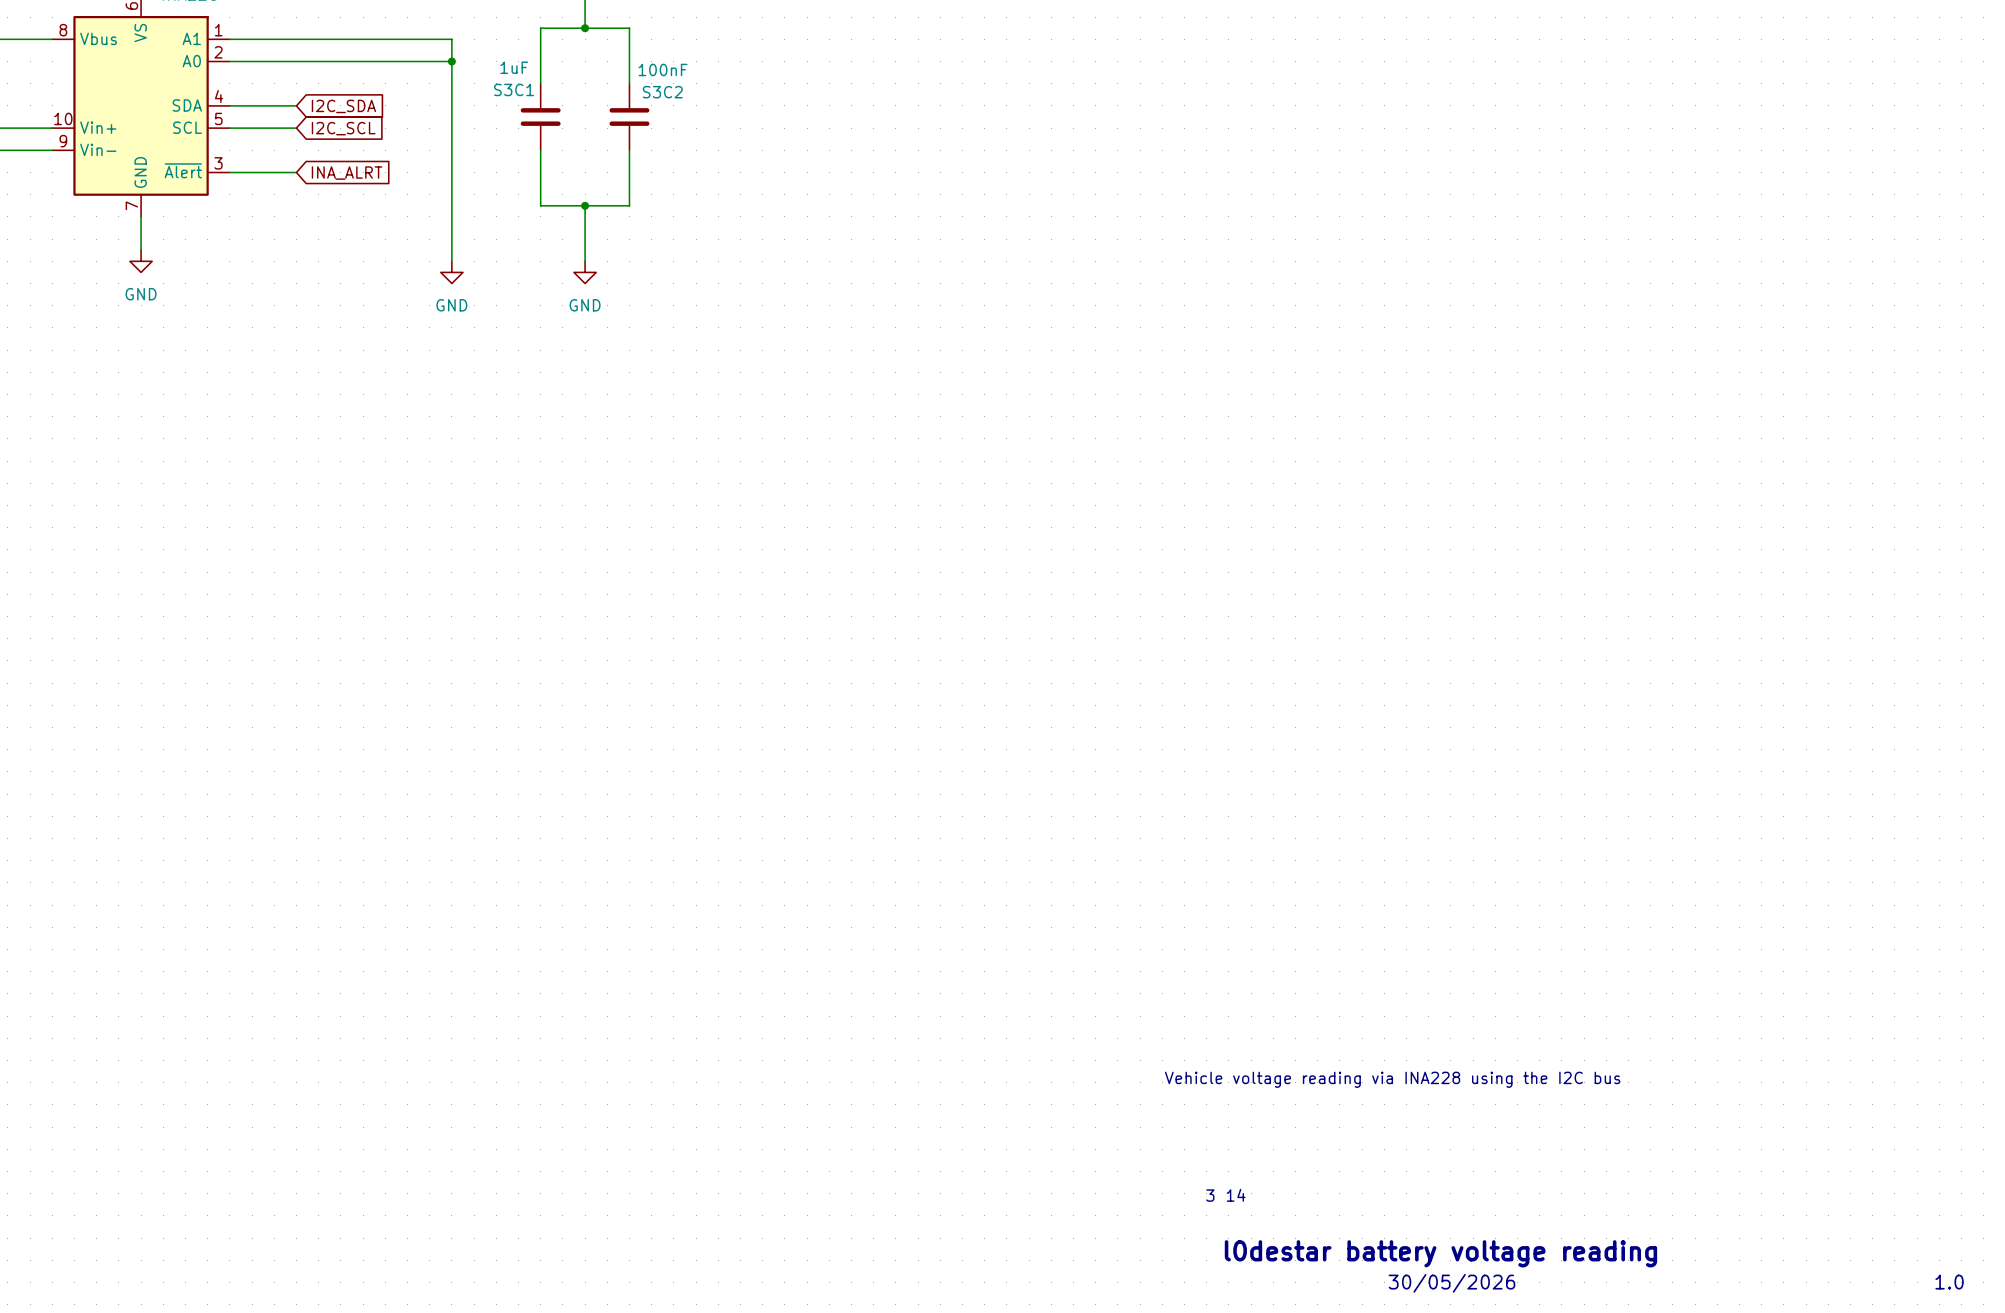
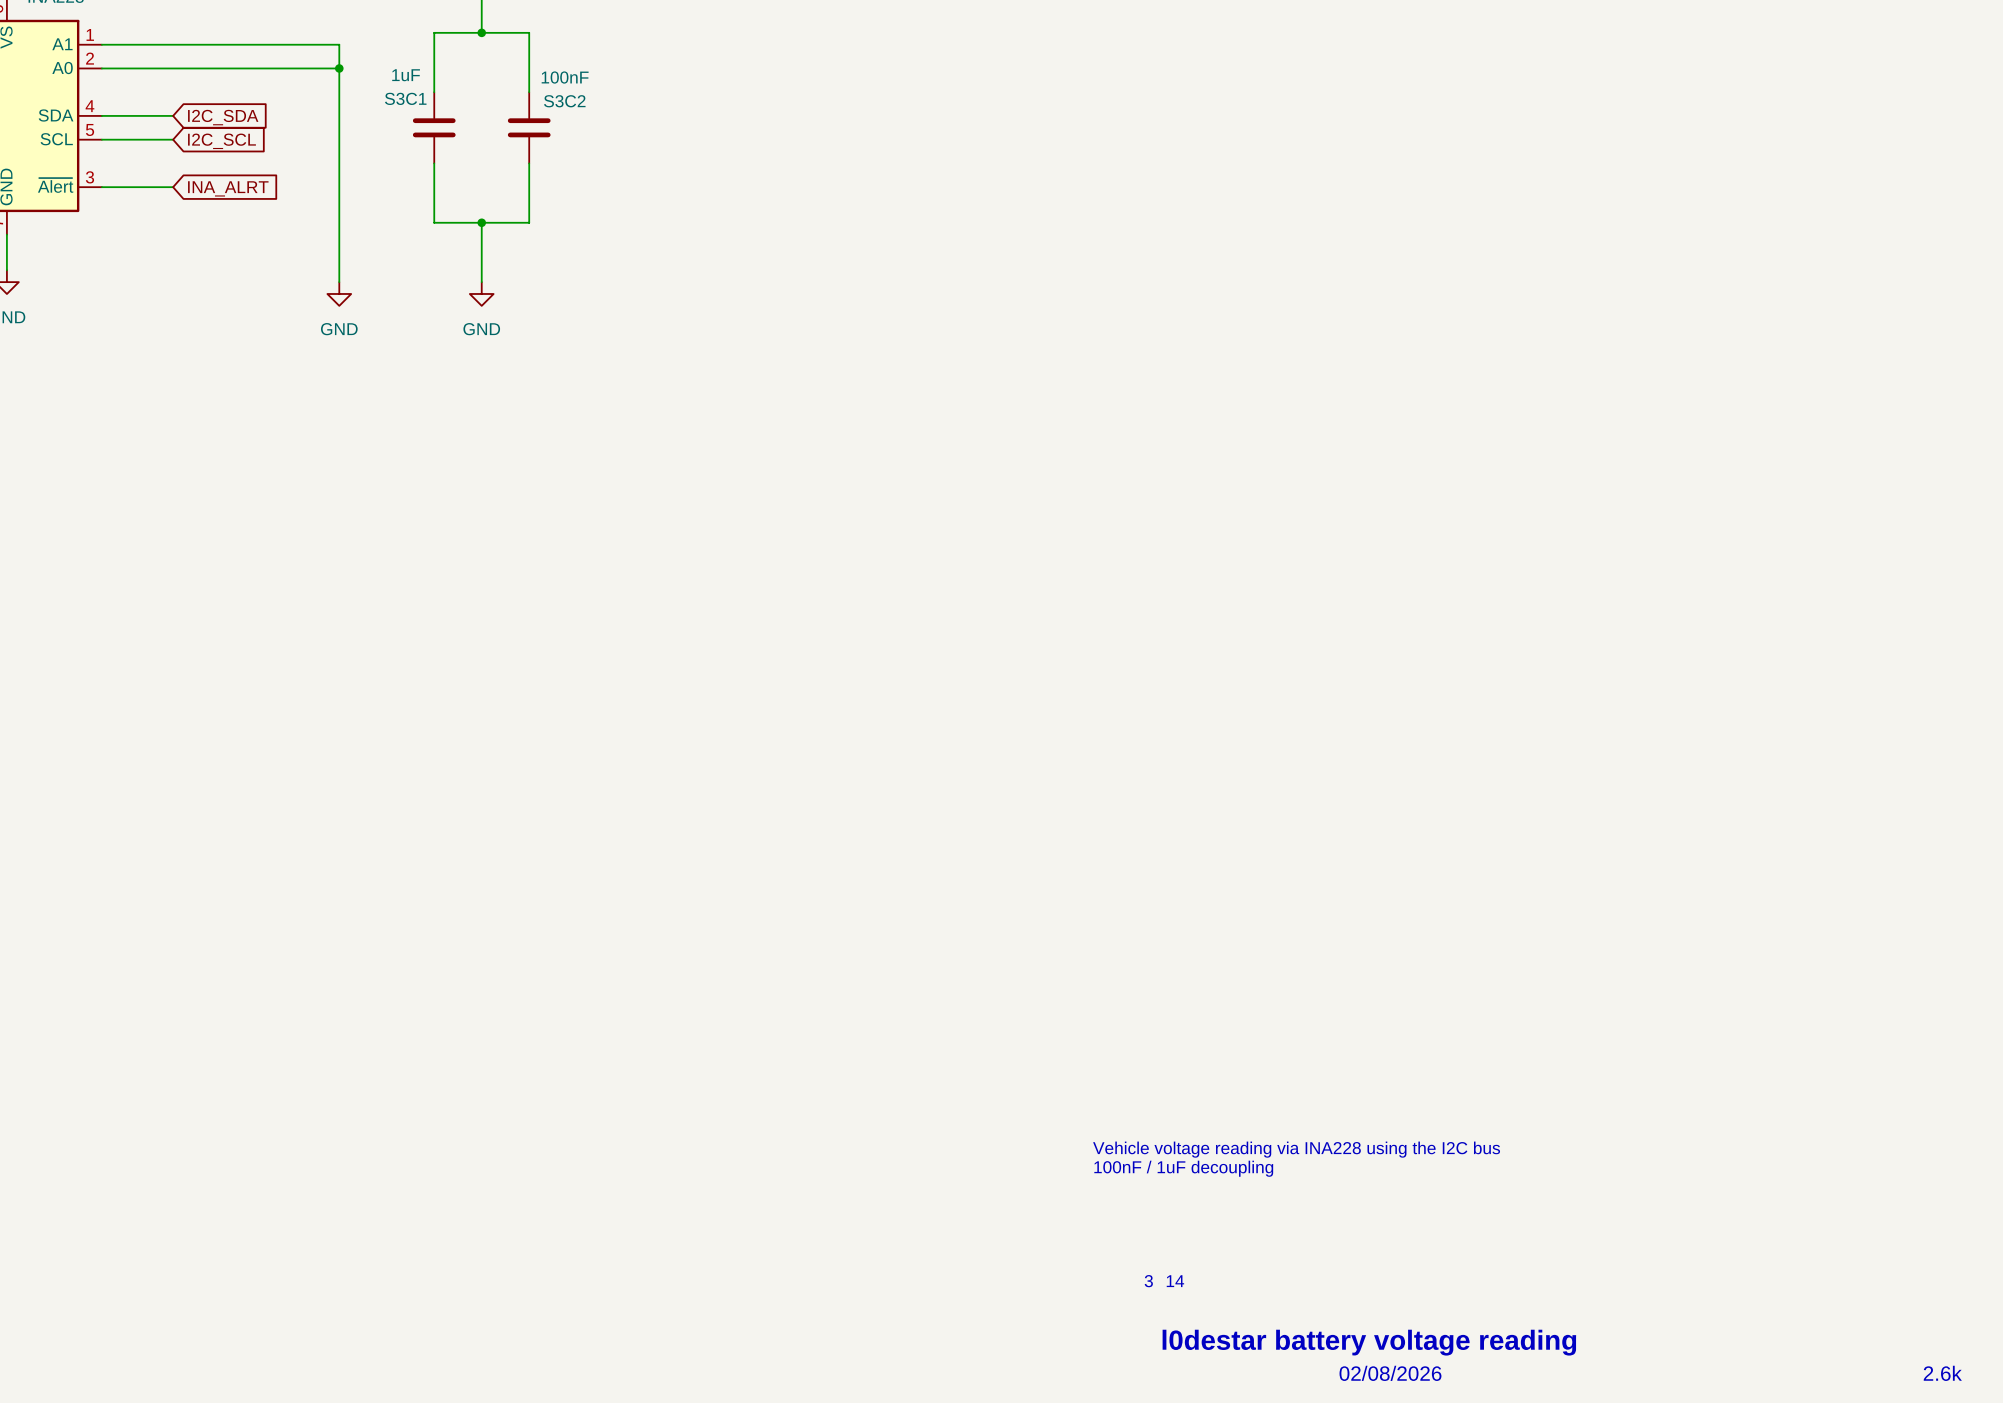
text: none -> Vehicle voltage reading via INA228 using the I2C bus (1296, 1149)
text: Vehicle voltage reading via INA228 using the I2C bus (1392, 1079) -> none
text: none -> 100nF / 1uF decoupling (1183, 1168)
text: 1.0 (1949, 1282) -> 2.6k (1942, 1373)
text: 30/05/2026 (1451, 1283) -> 02/08/2026 (1390, 1373)

